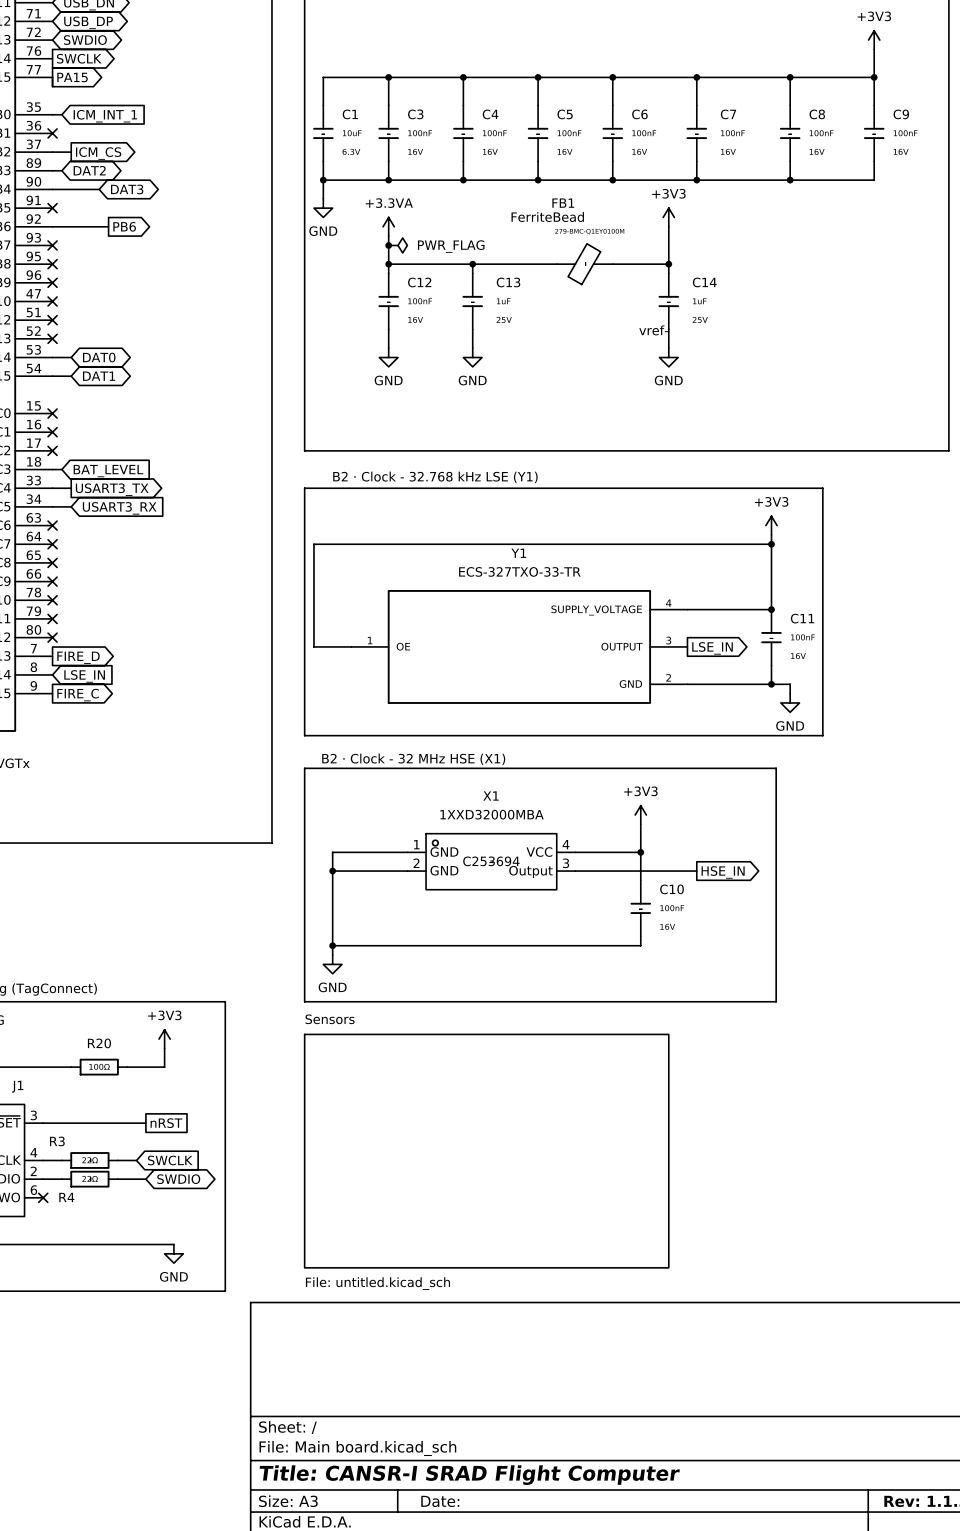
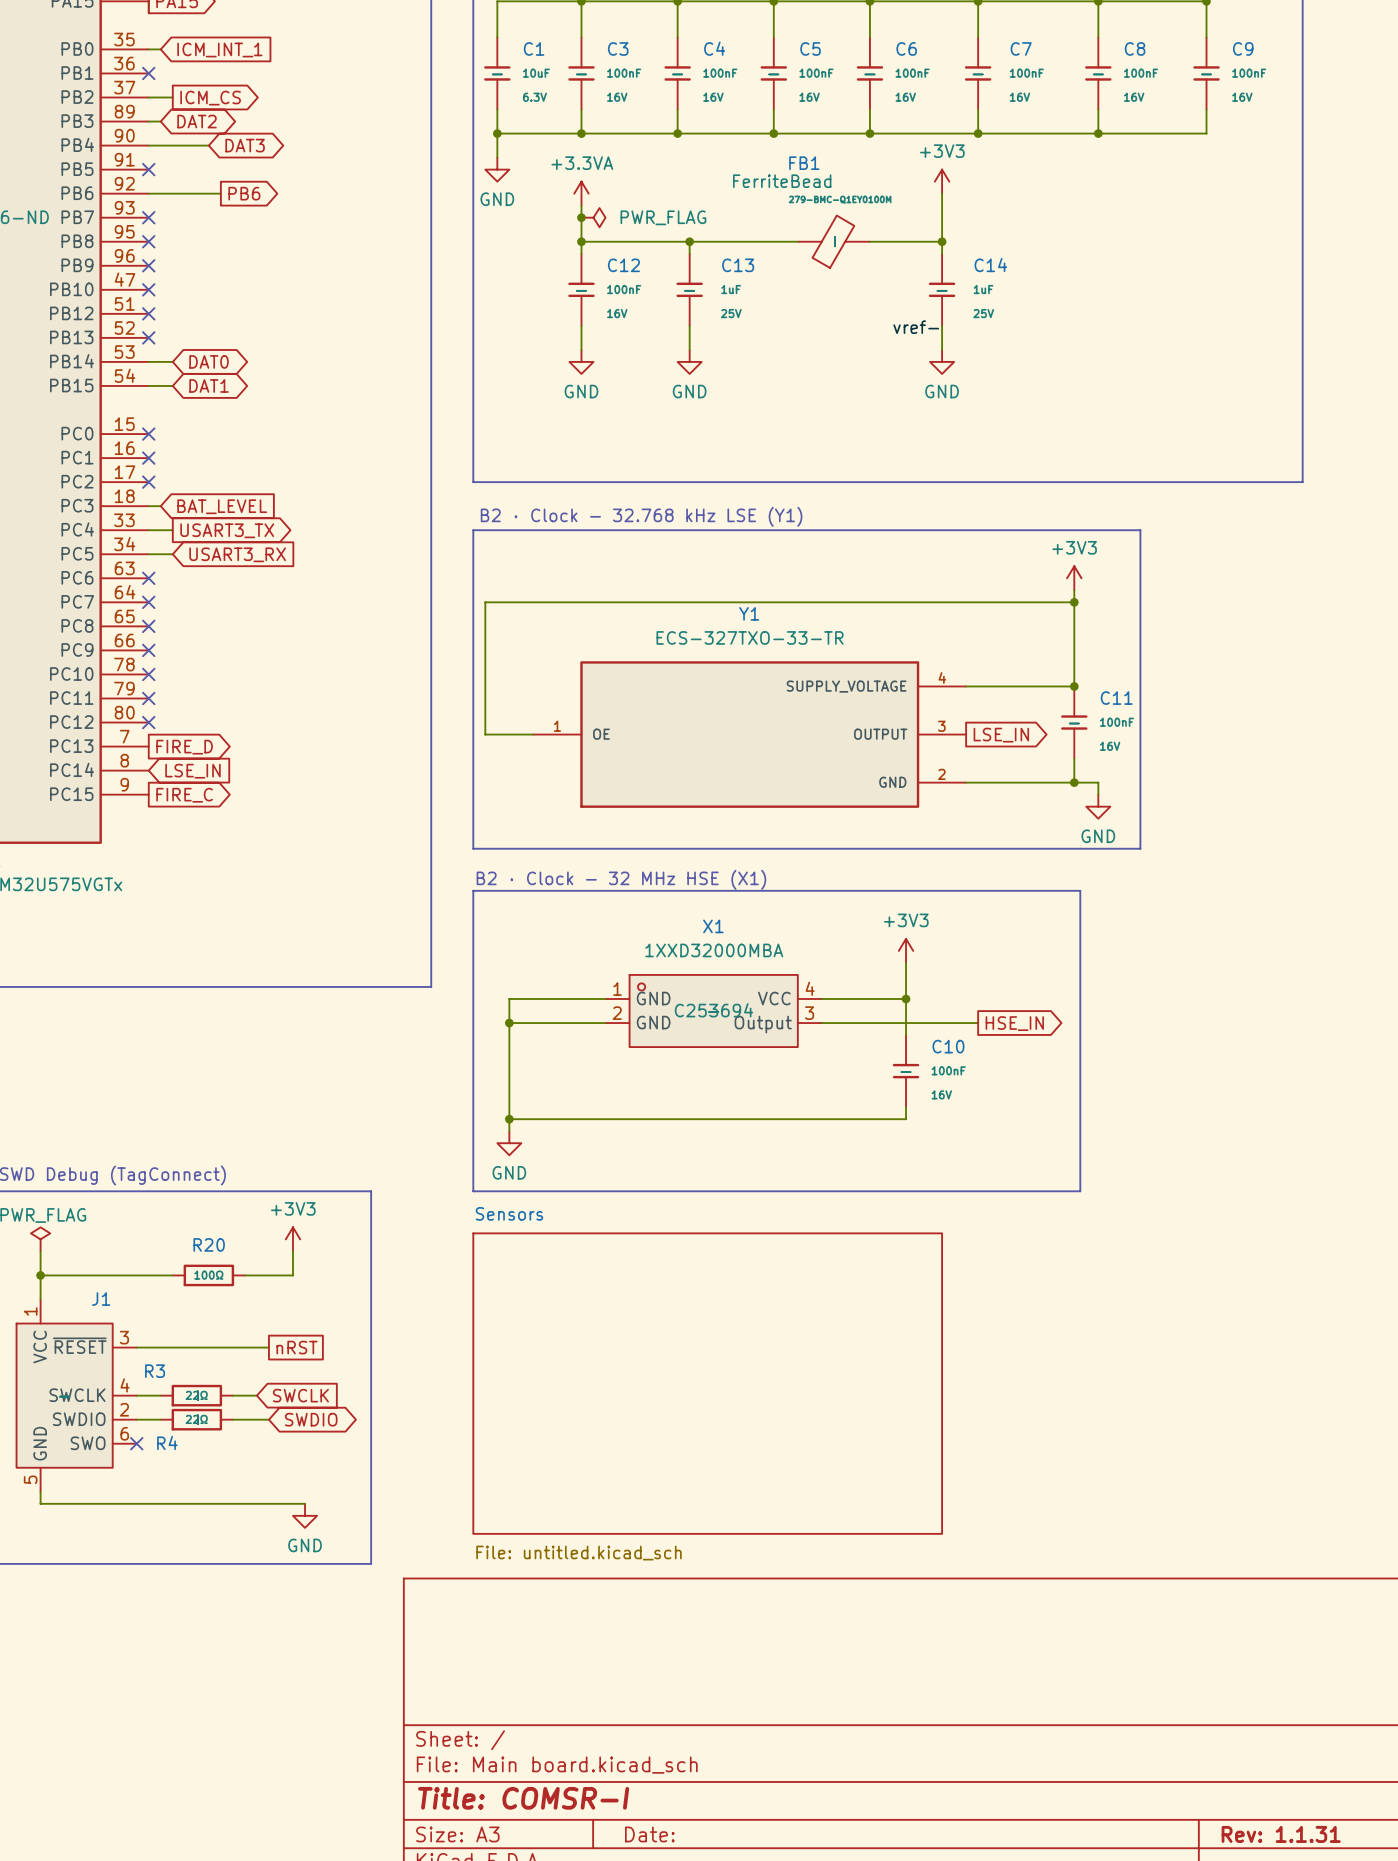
title block: Title: CANSR-I SRAD Flight Computer (469, 1475) -> Title: COMSR-I (523, 1798)

